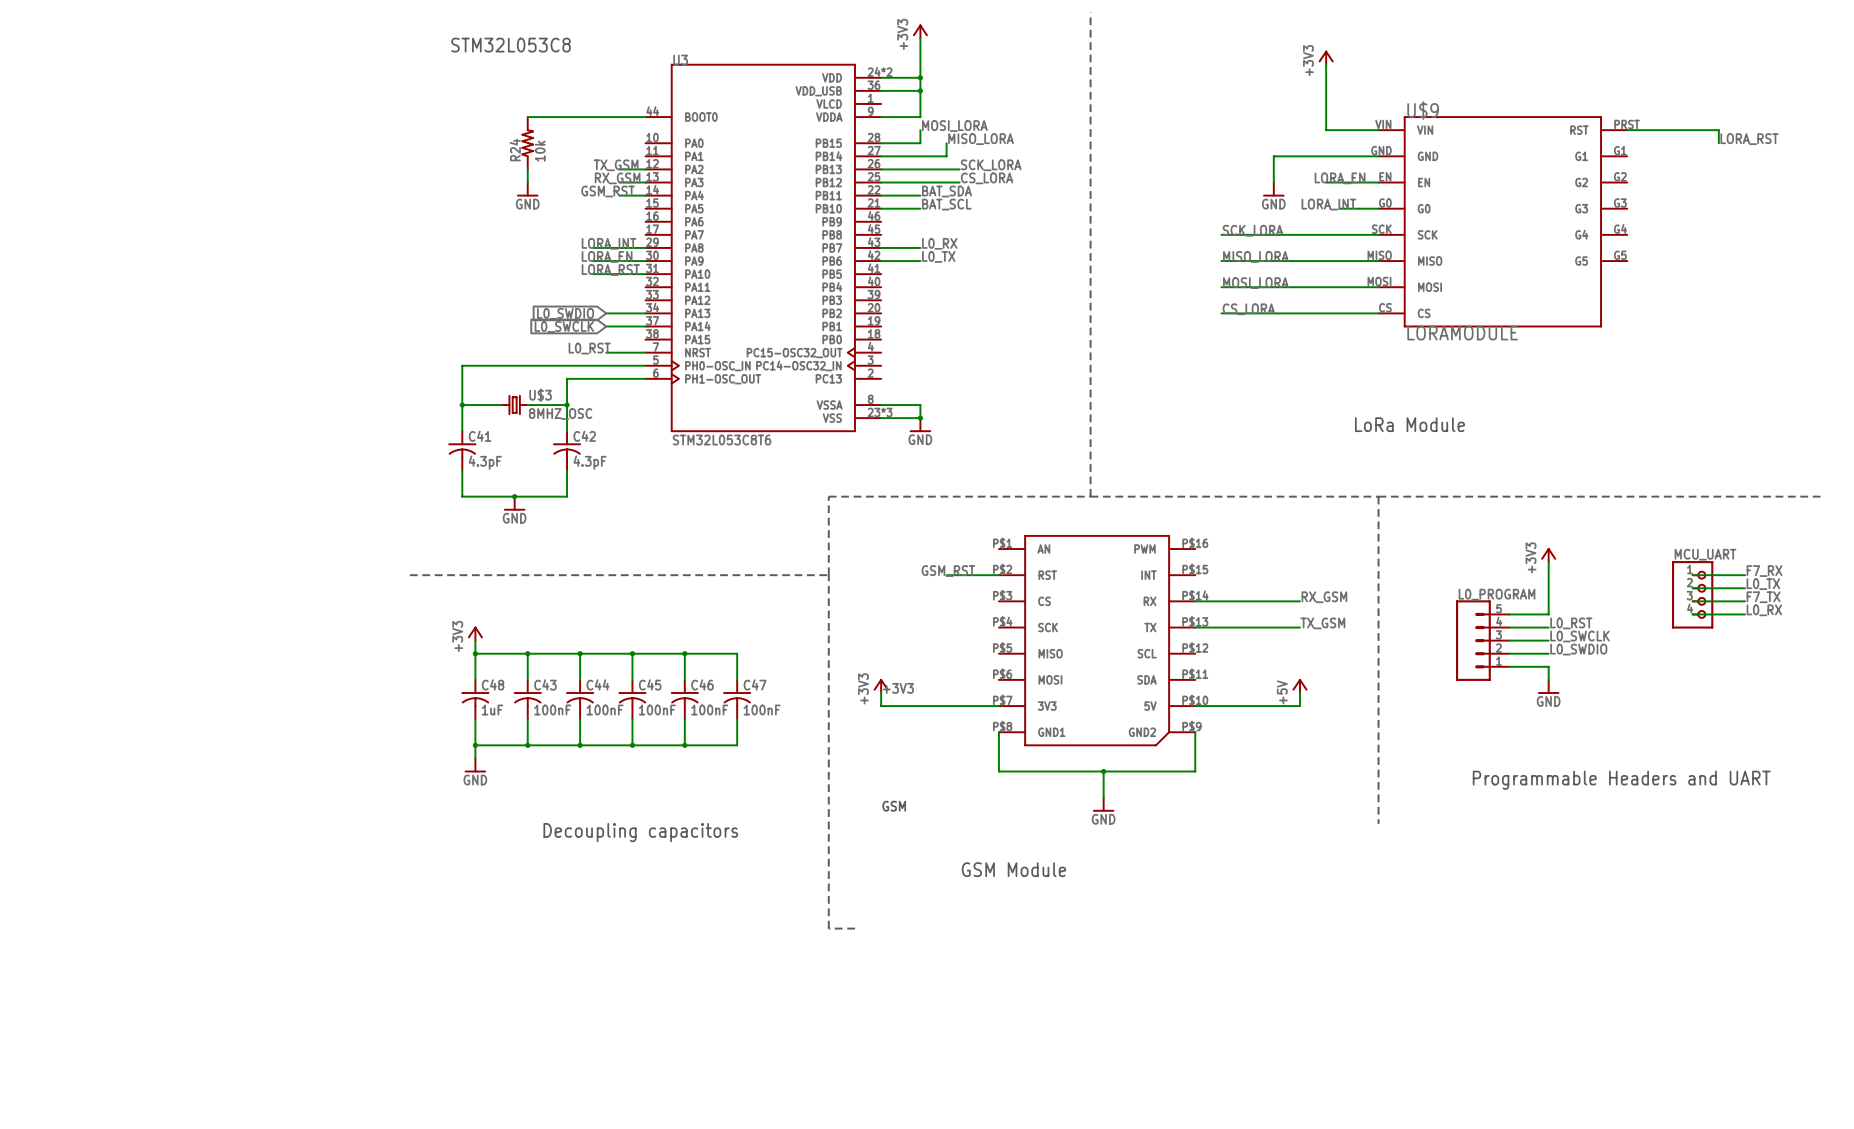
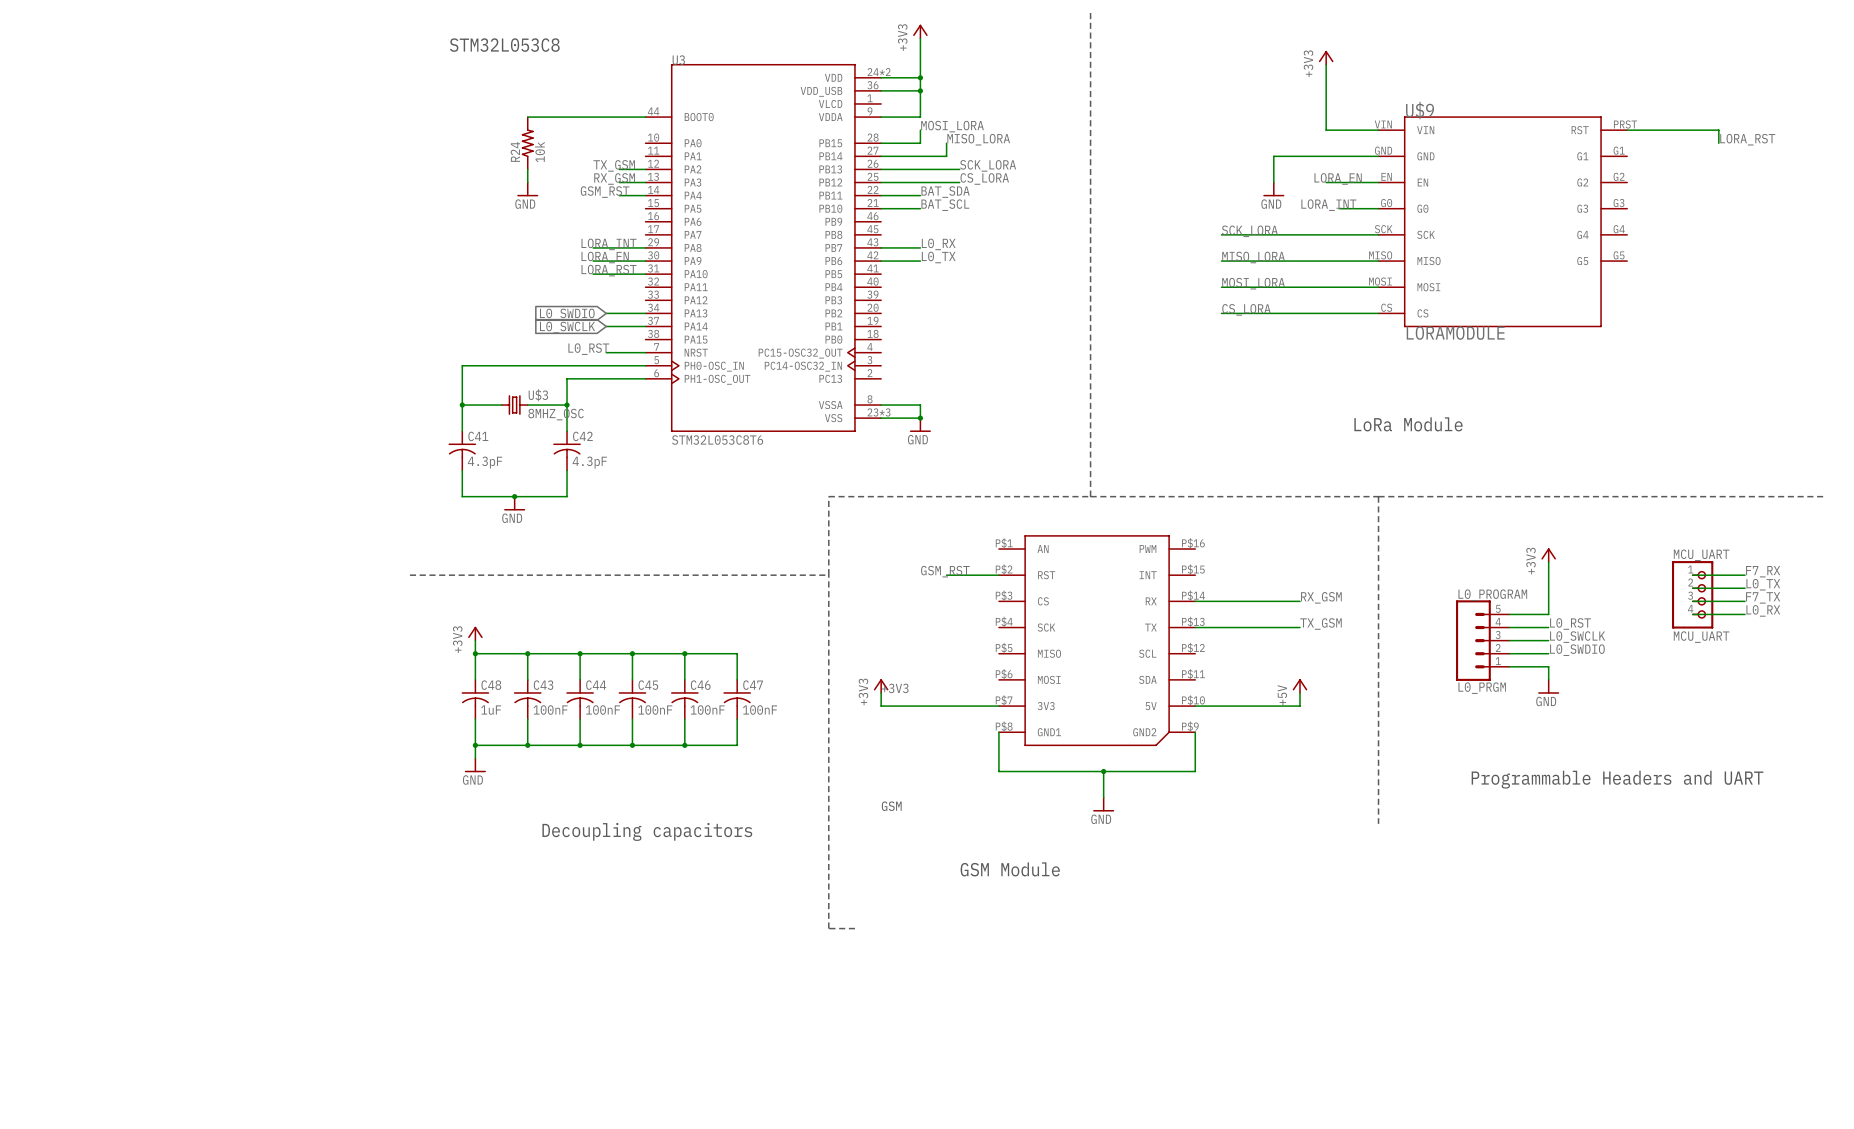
MCU_UART value: none -> MCU_UART (1701, 637)
L0_PROGRAM value: none -> L0_PRGM (1482, 688)

